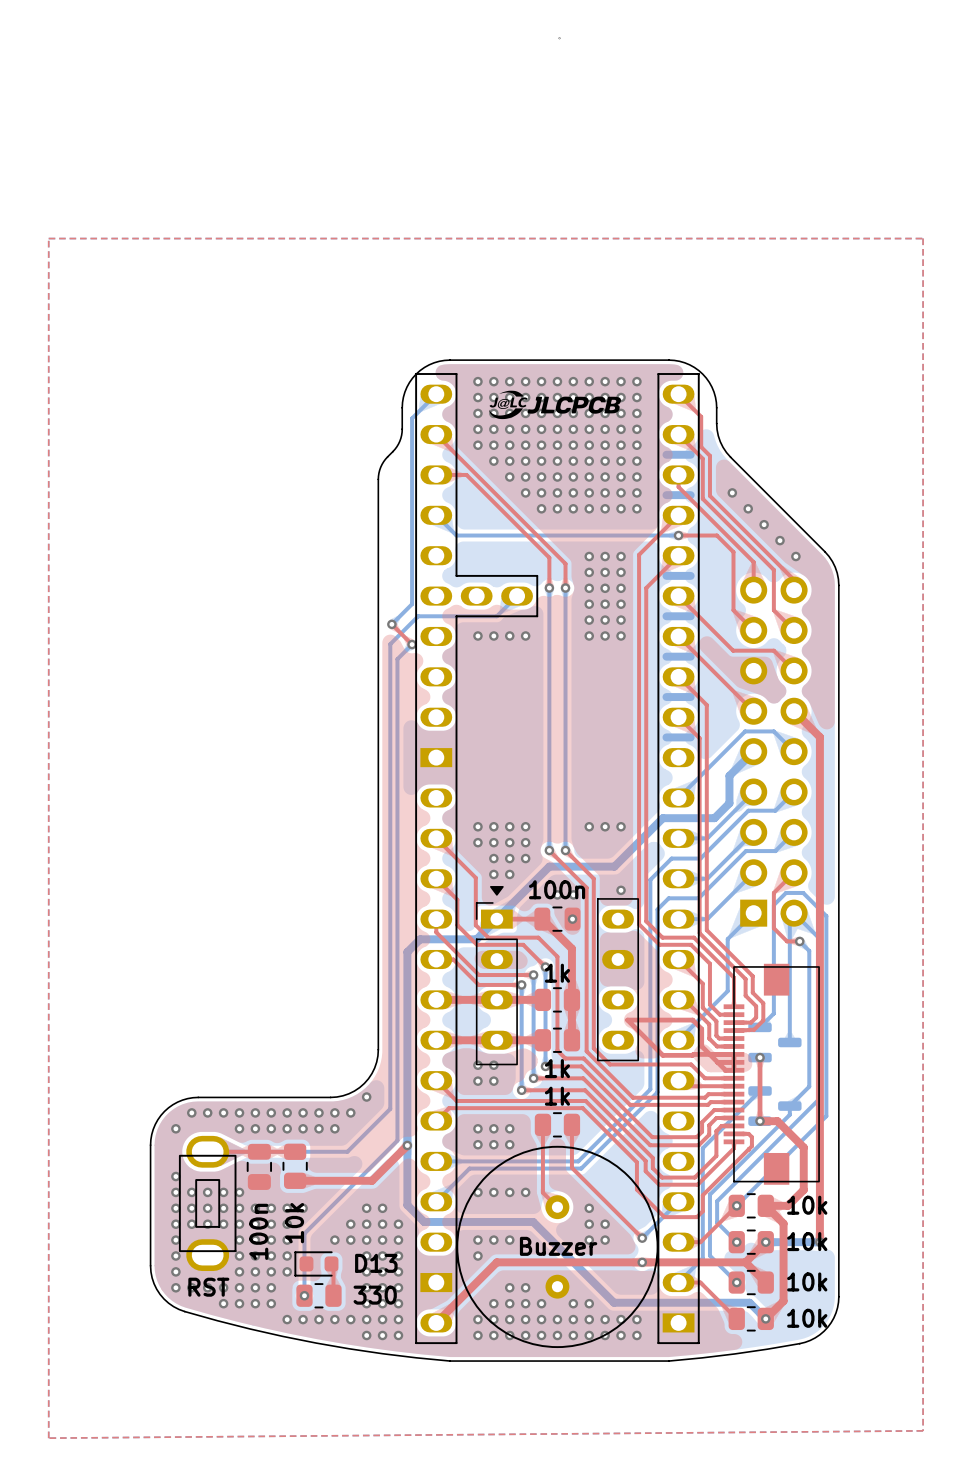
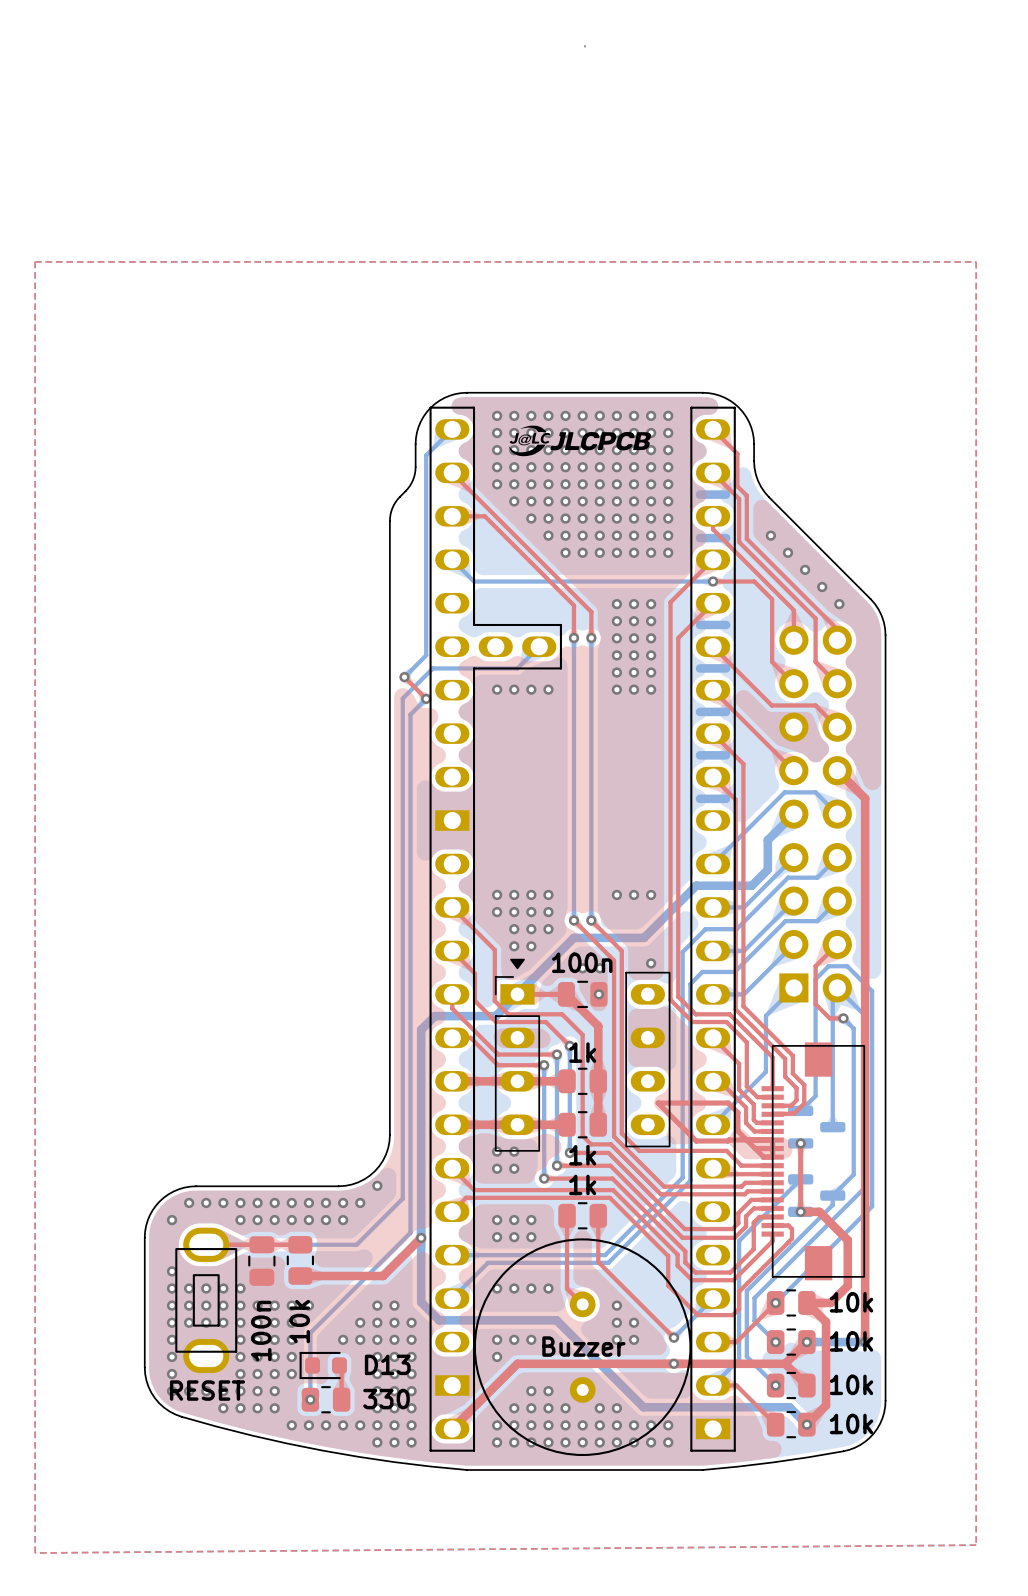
part value: RST (208, 1287) -> RESET (207, 1390)

